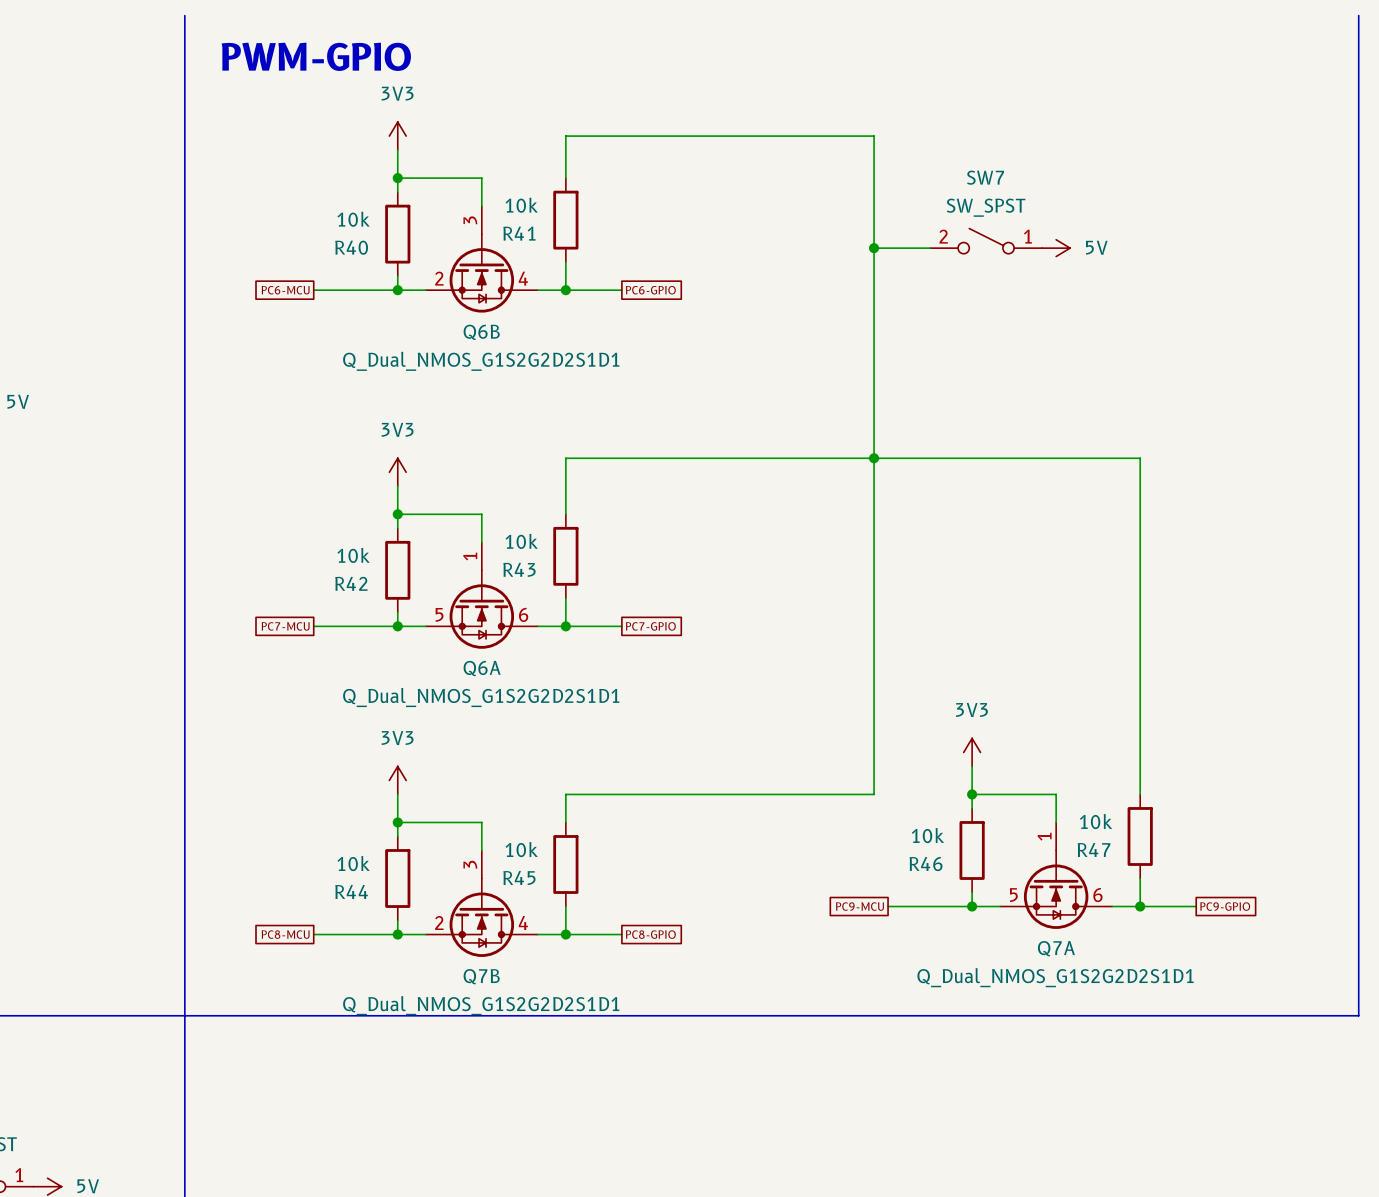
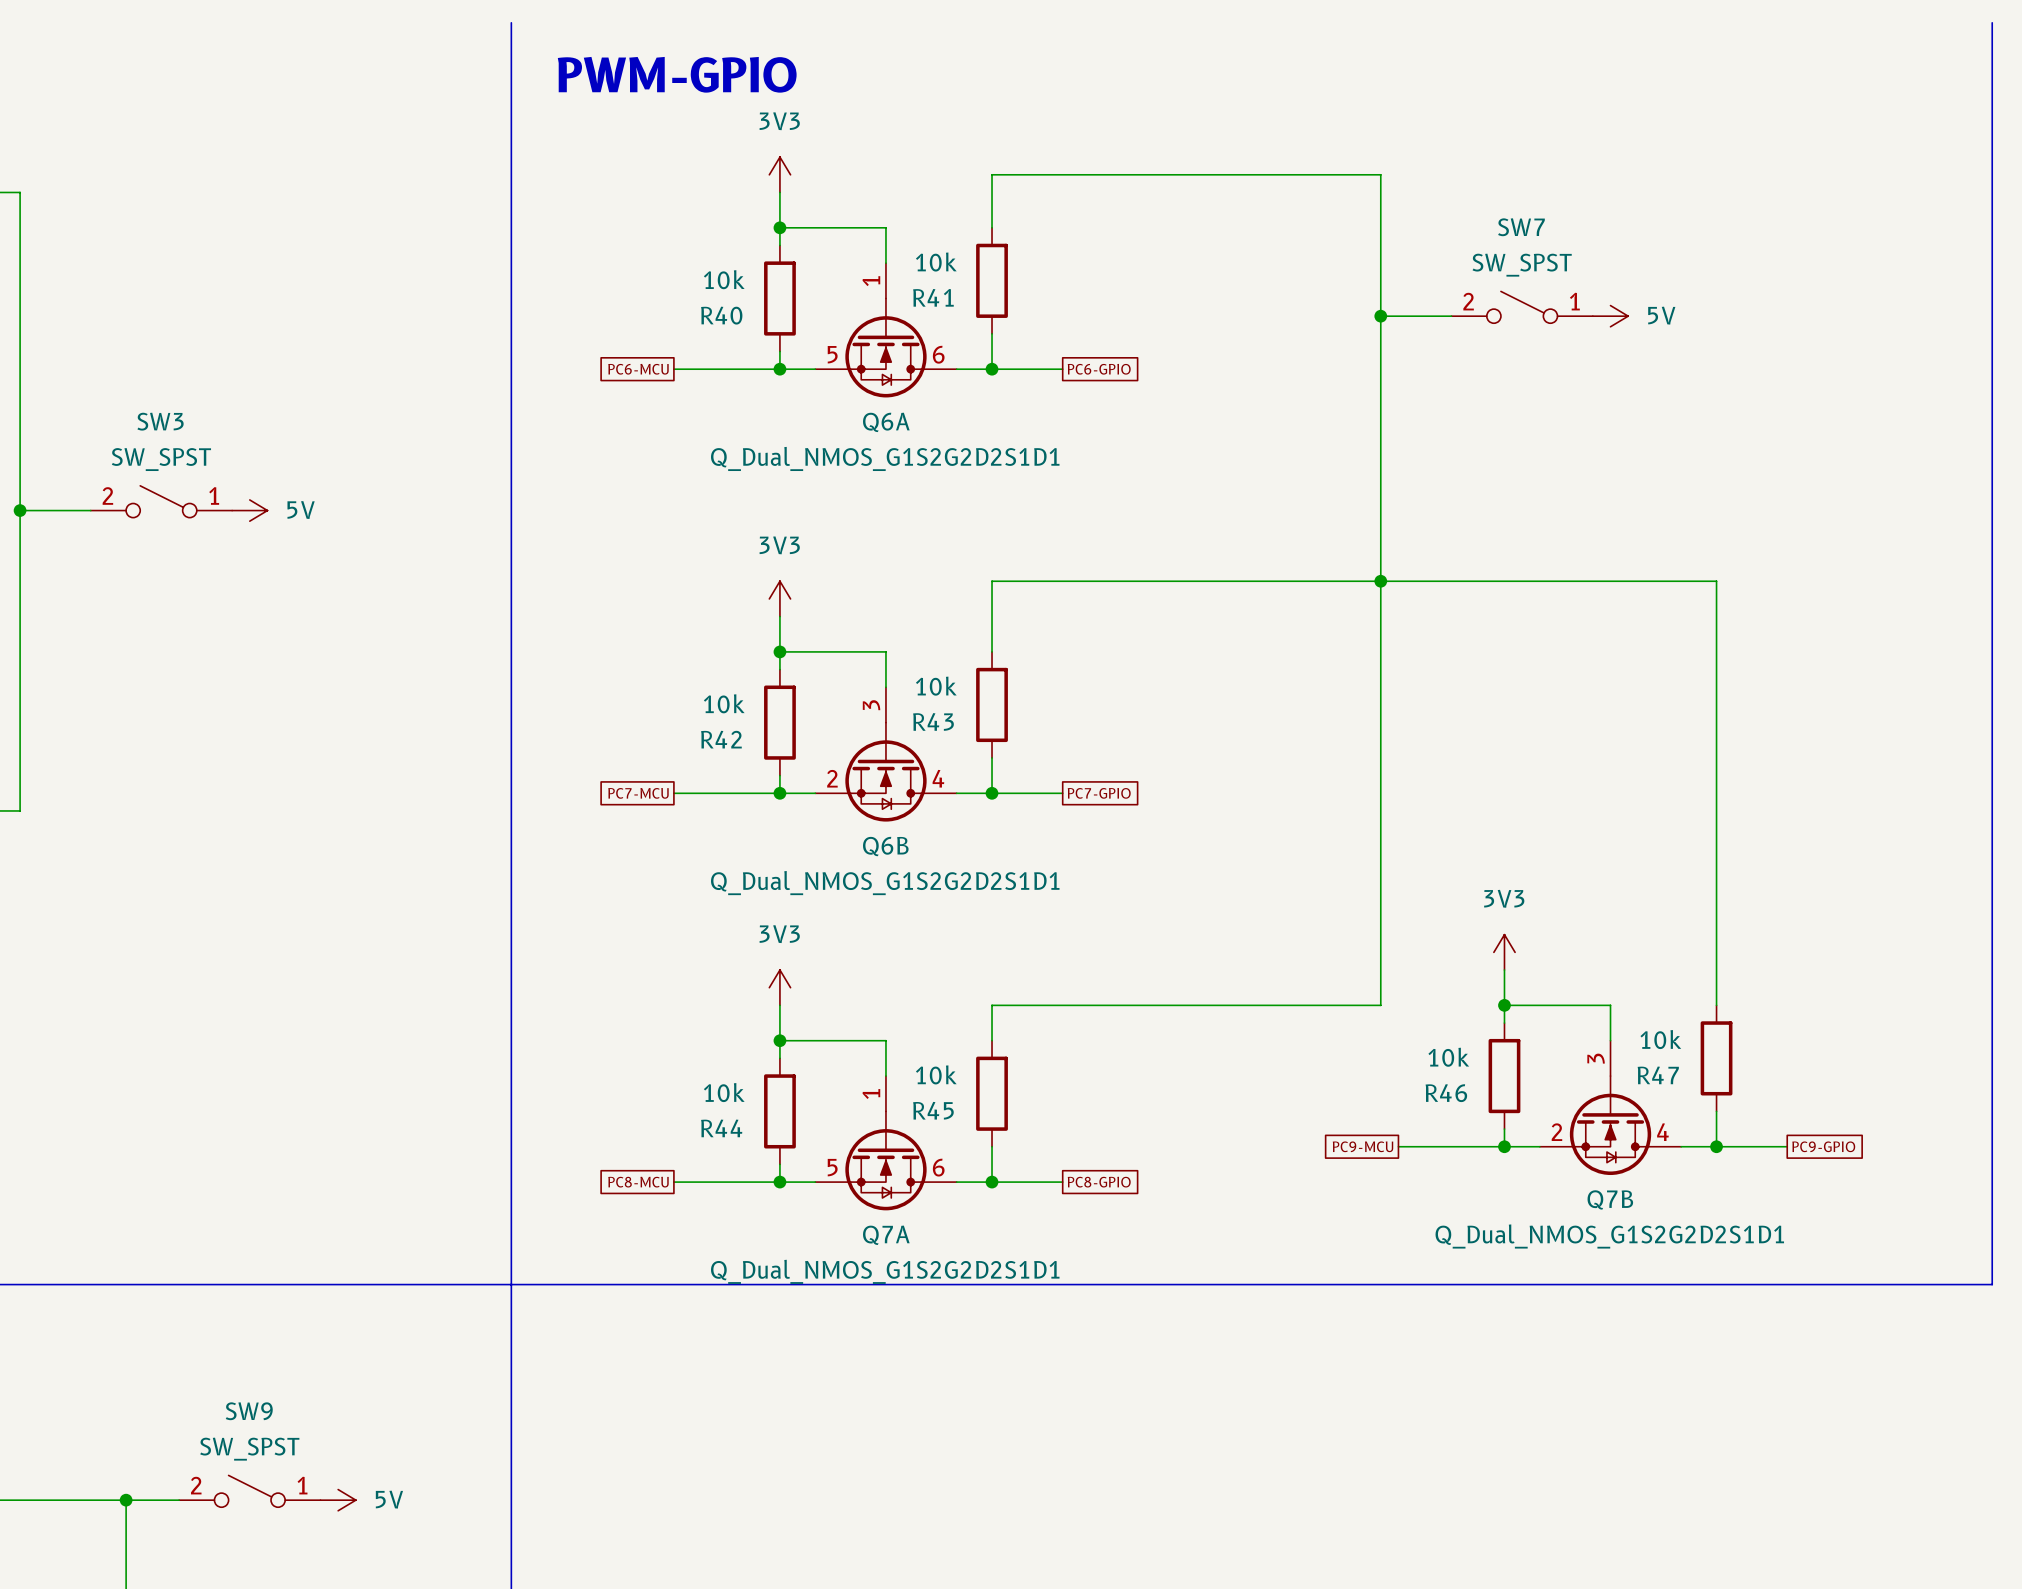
Q6B position: (481, 259) -> (885, 754)
Q6A position: (481, 595) -> (885, 330)
Q7A position: (1056, 875) -> (885, 1143)
Q7B position: (481, 903) -> (1610, 1107)

